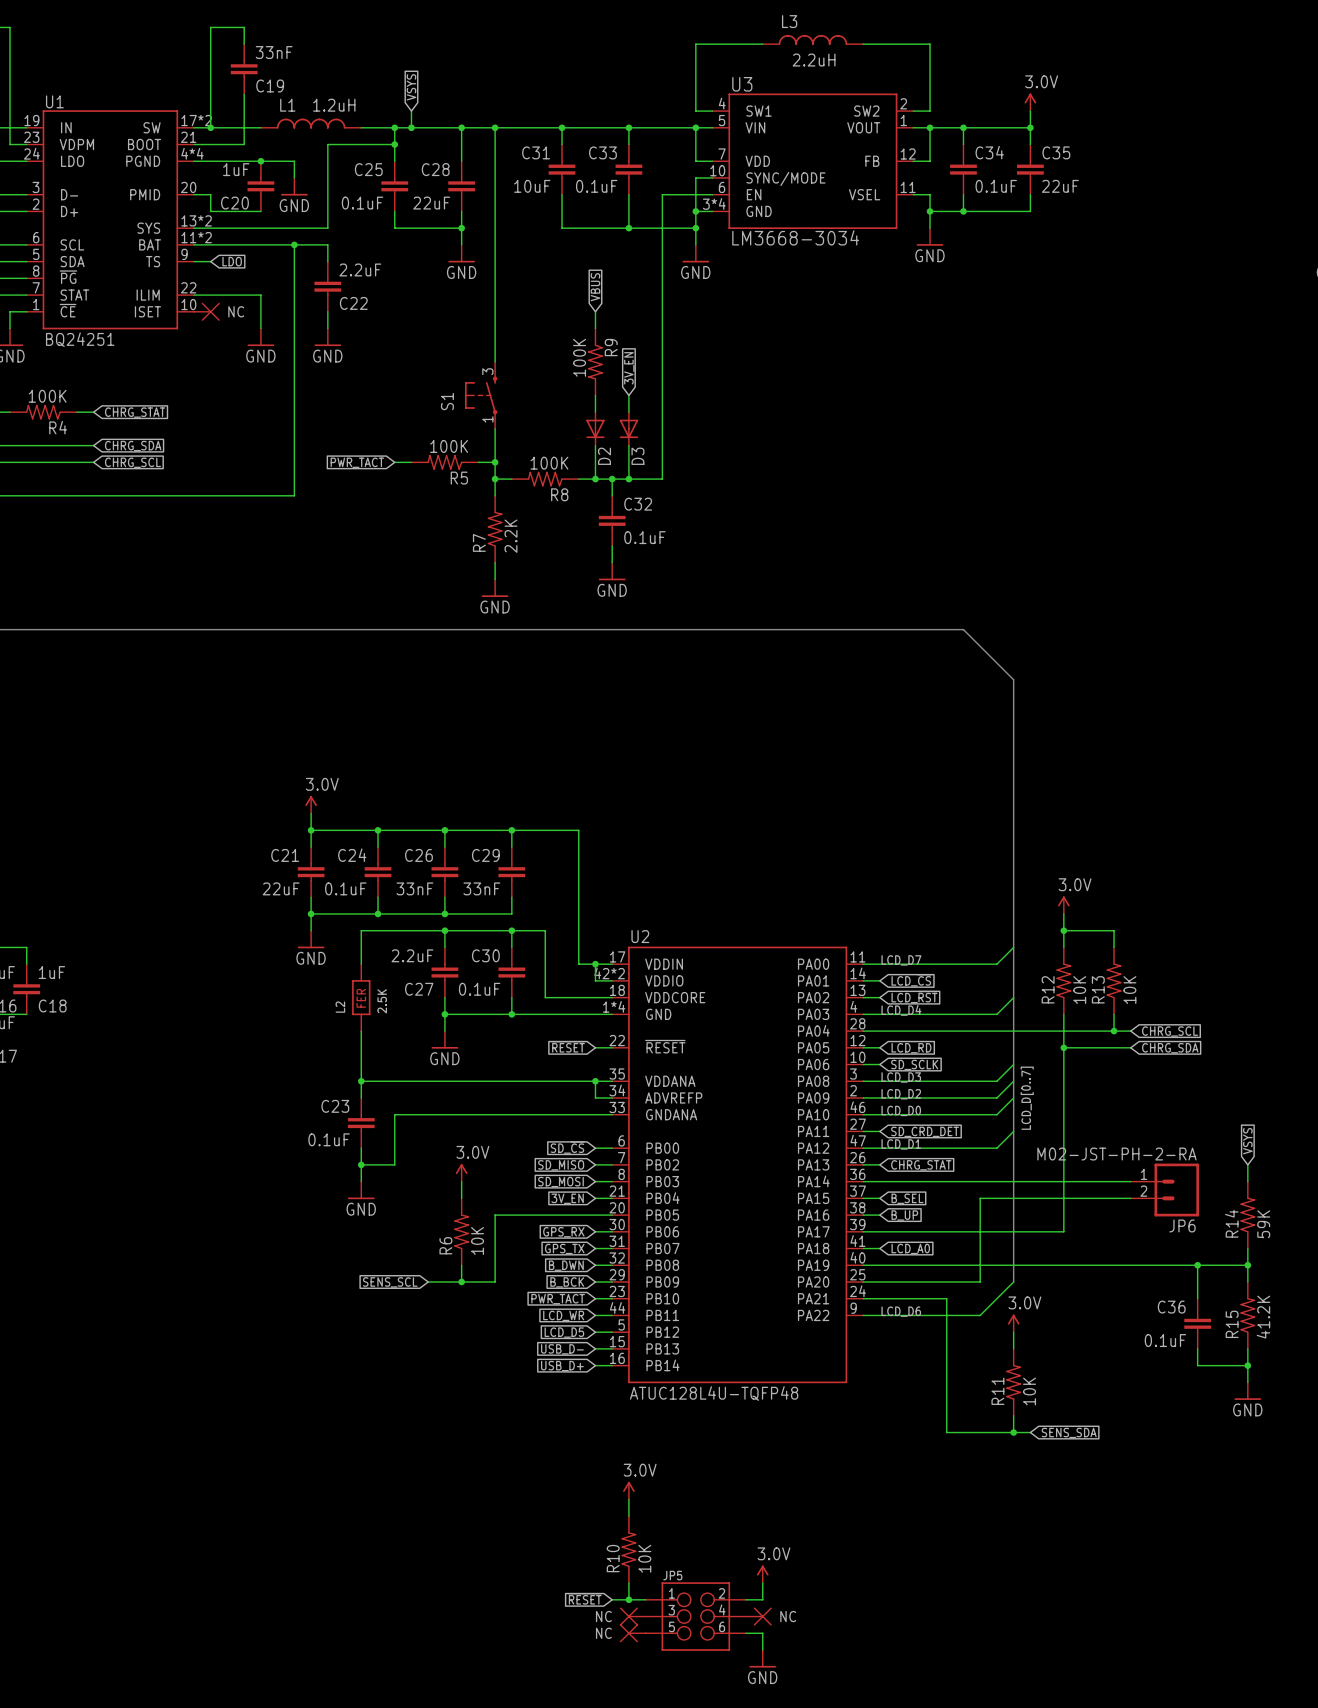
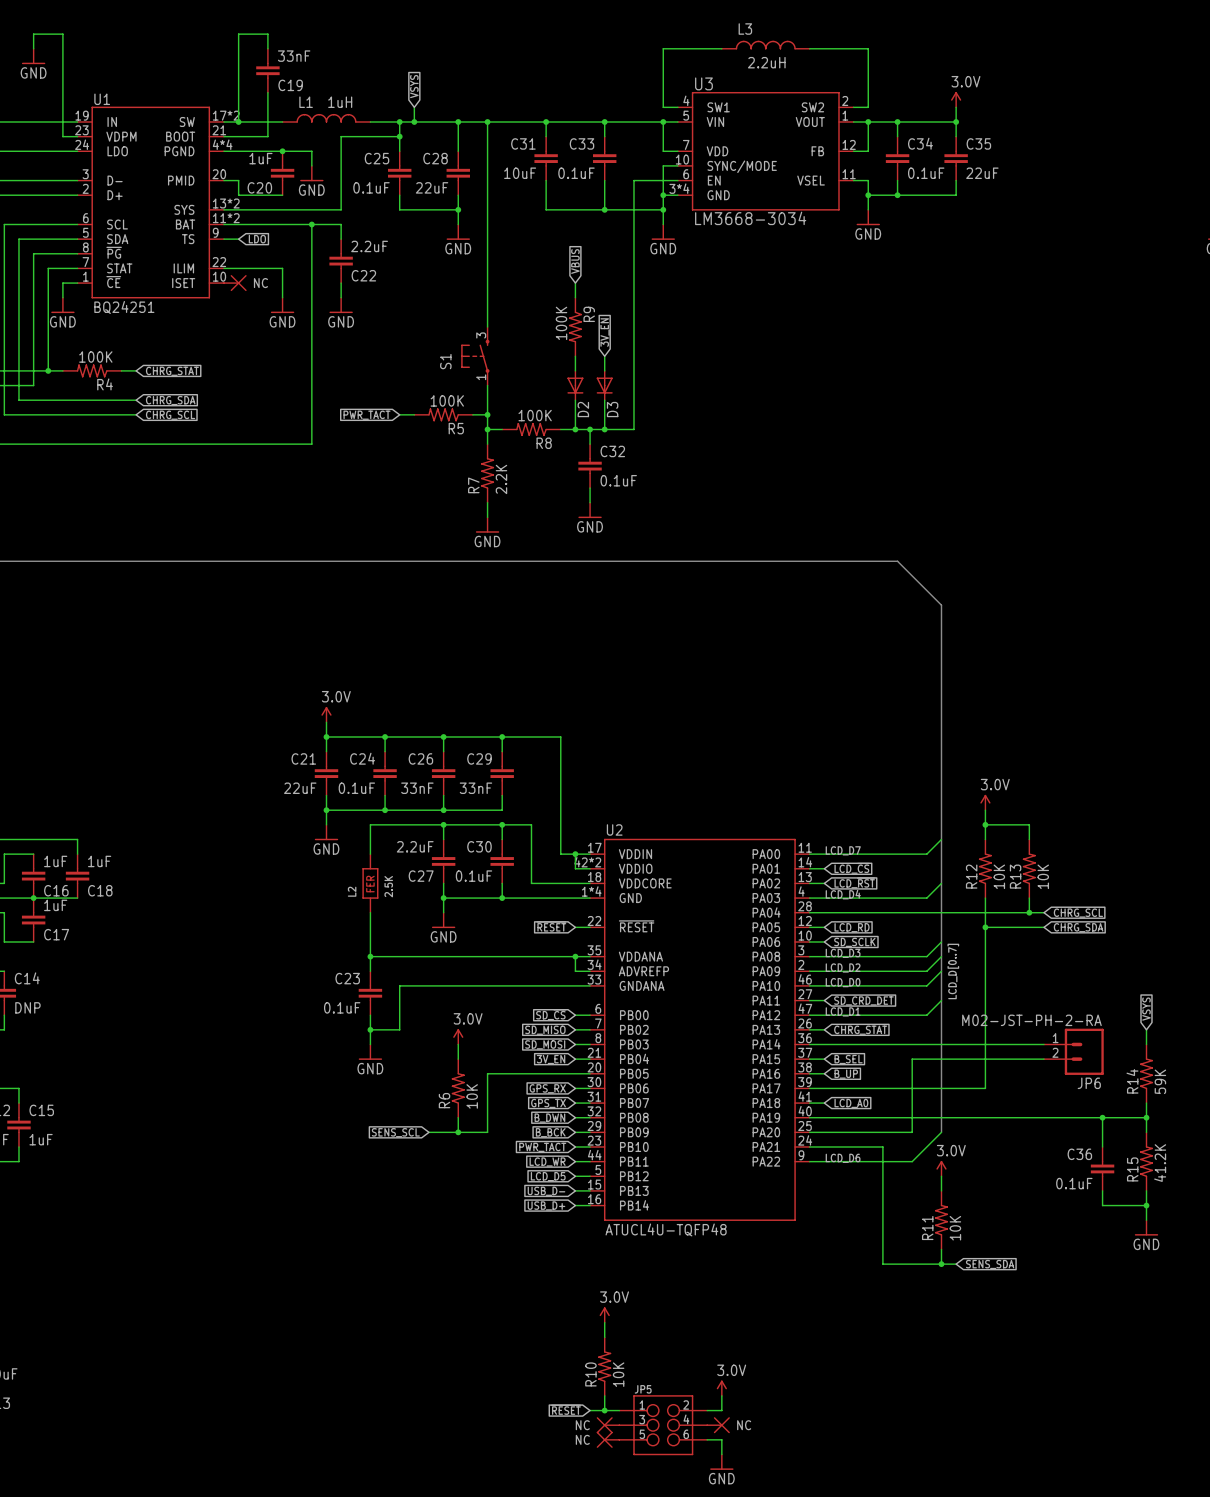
L1 value: 1.2uH (334, 105) -> 1uH (340, 102)
U2 value: ATUC128L4U-TQFP48 (714, 1393) -> ATUCL4U-TQFP48 (666, 1229)

